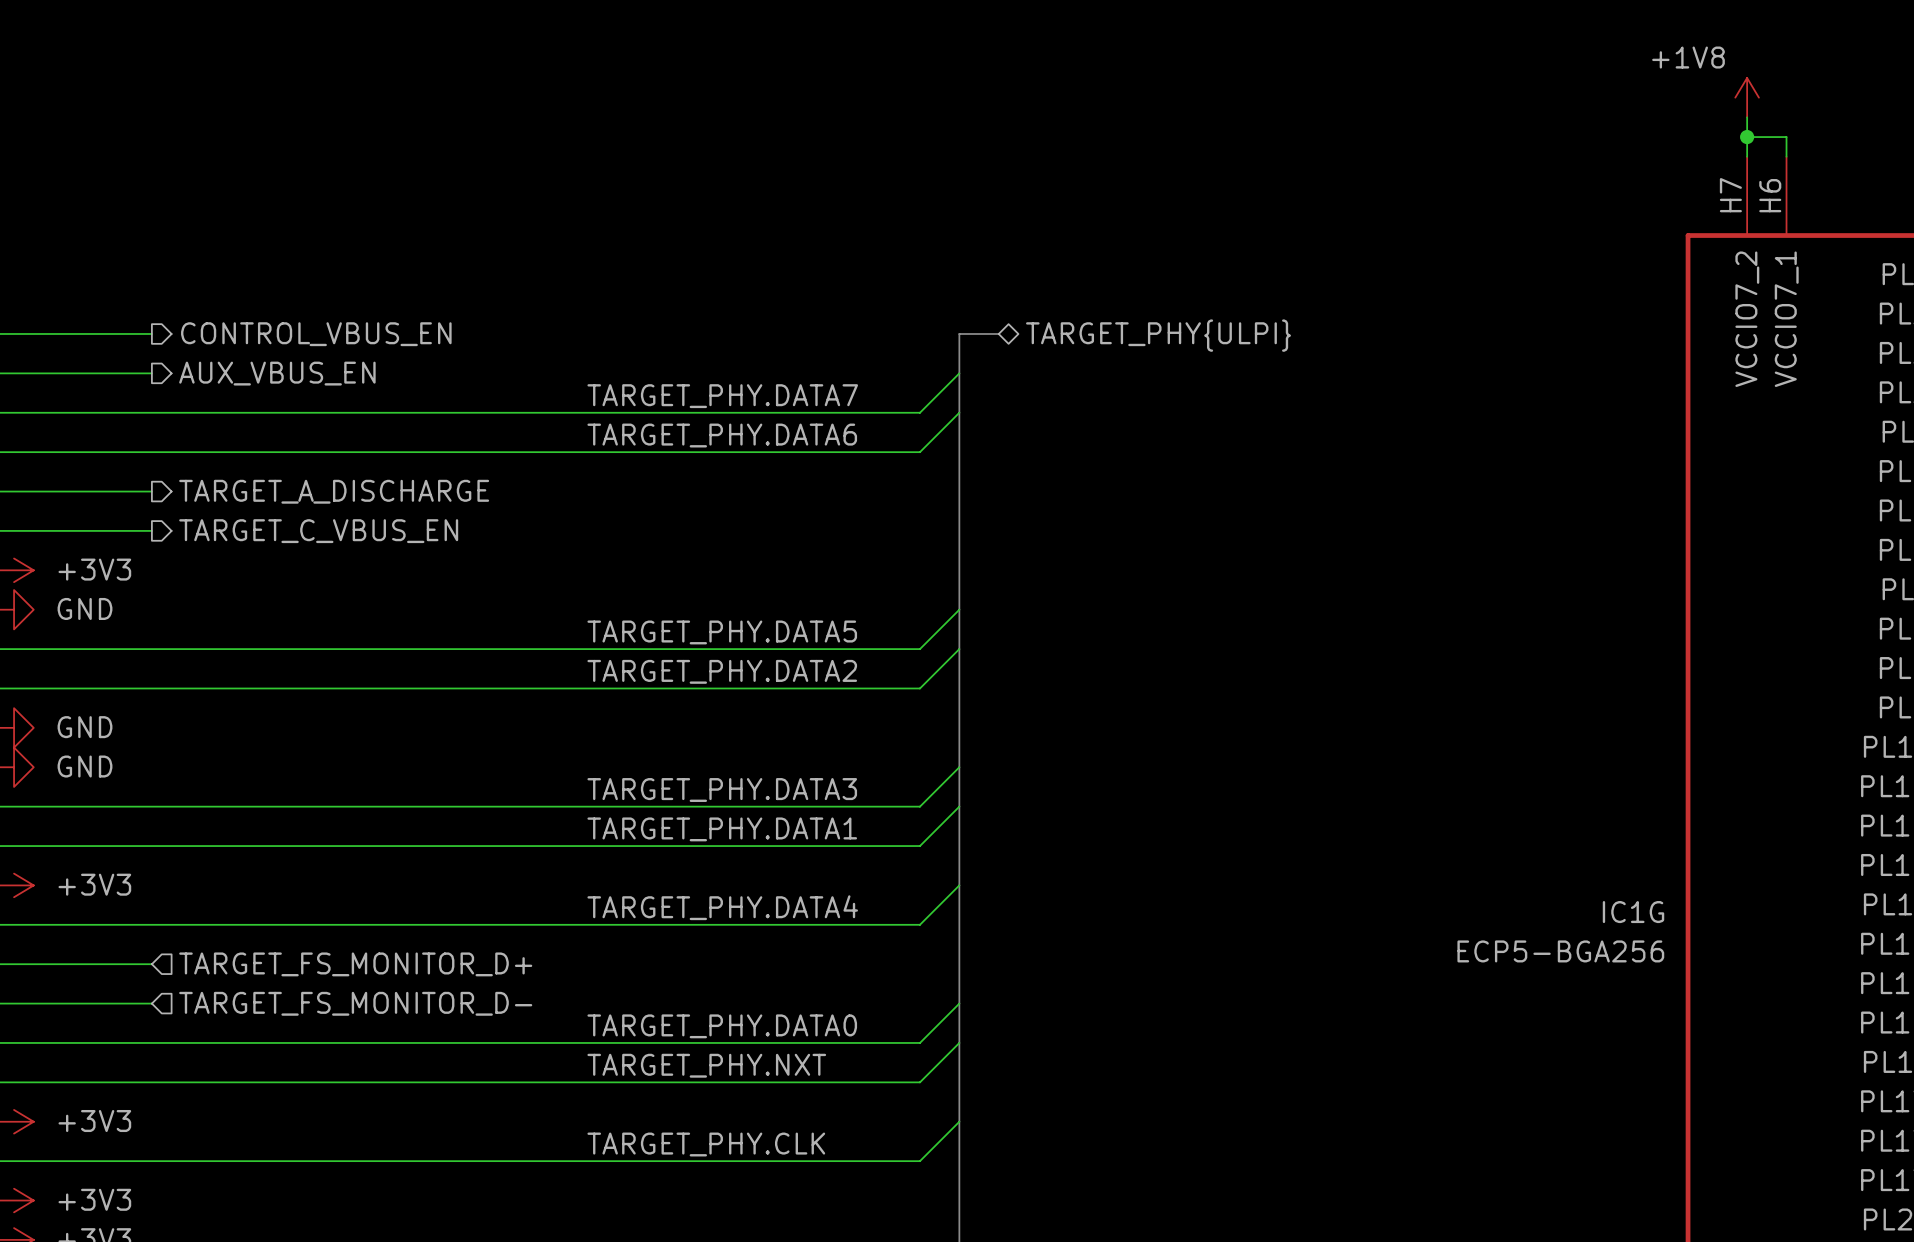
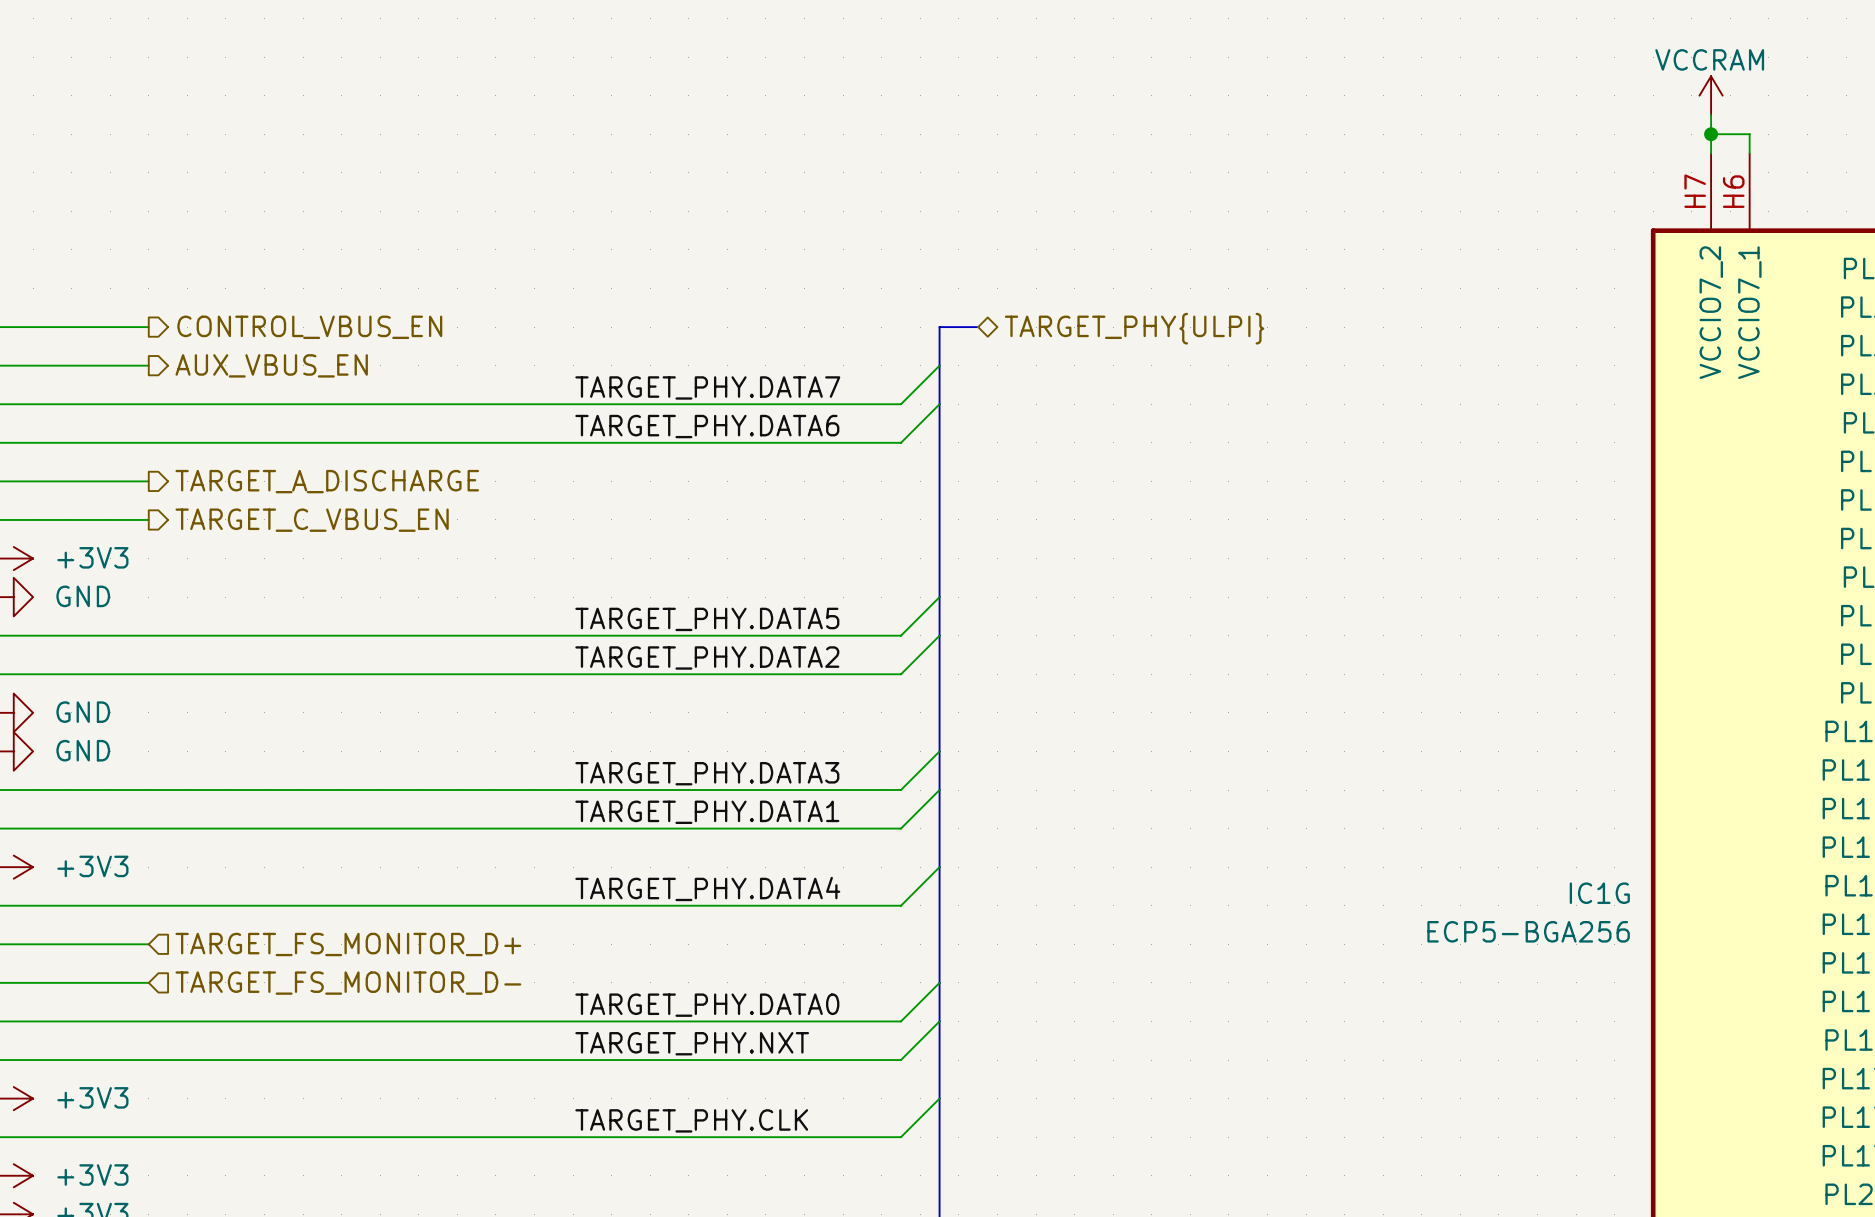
power symbol: +1V8 (1747, 97) -> VCCRAM (1711, 95)

